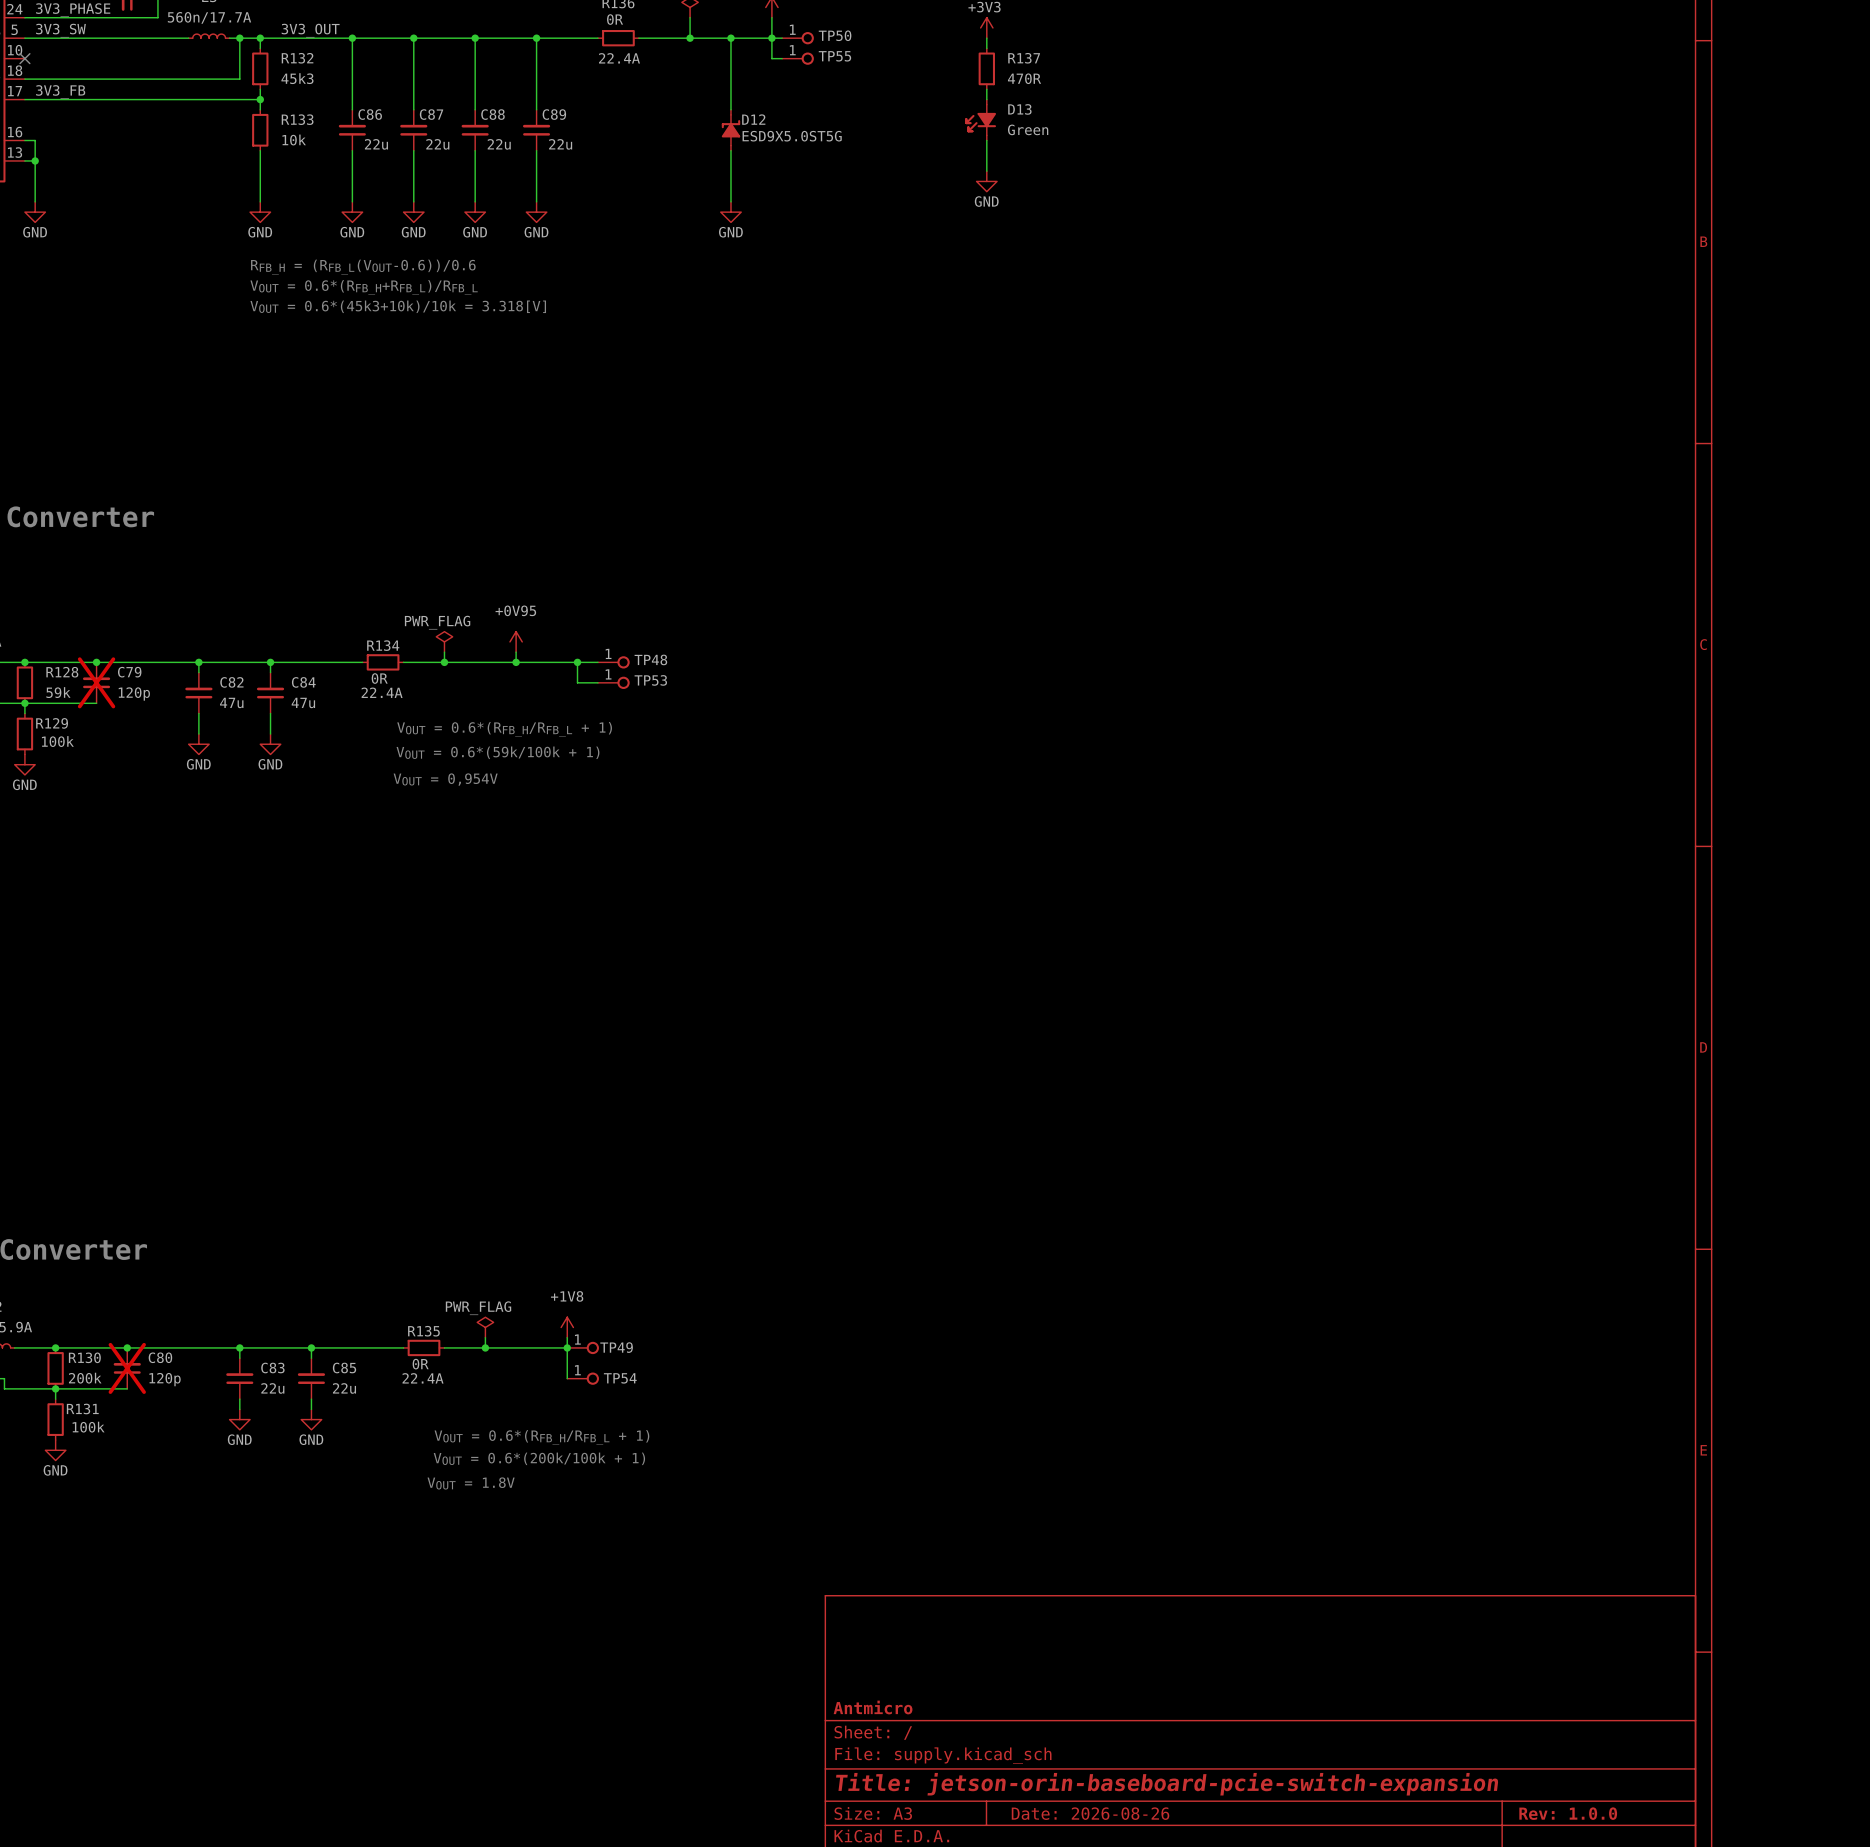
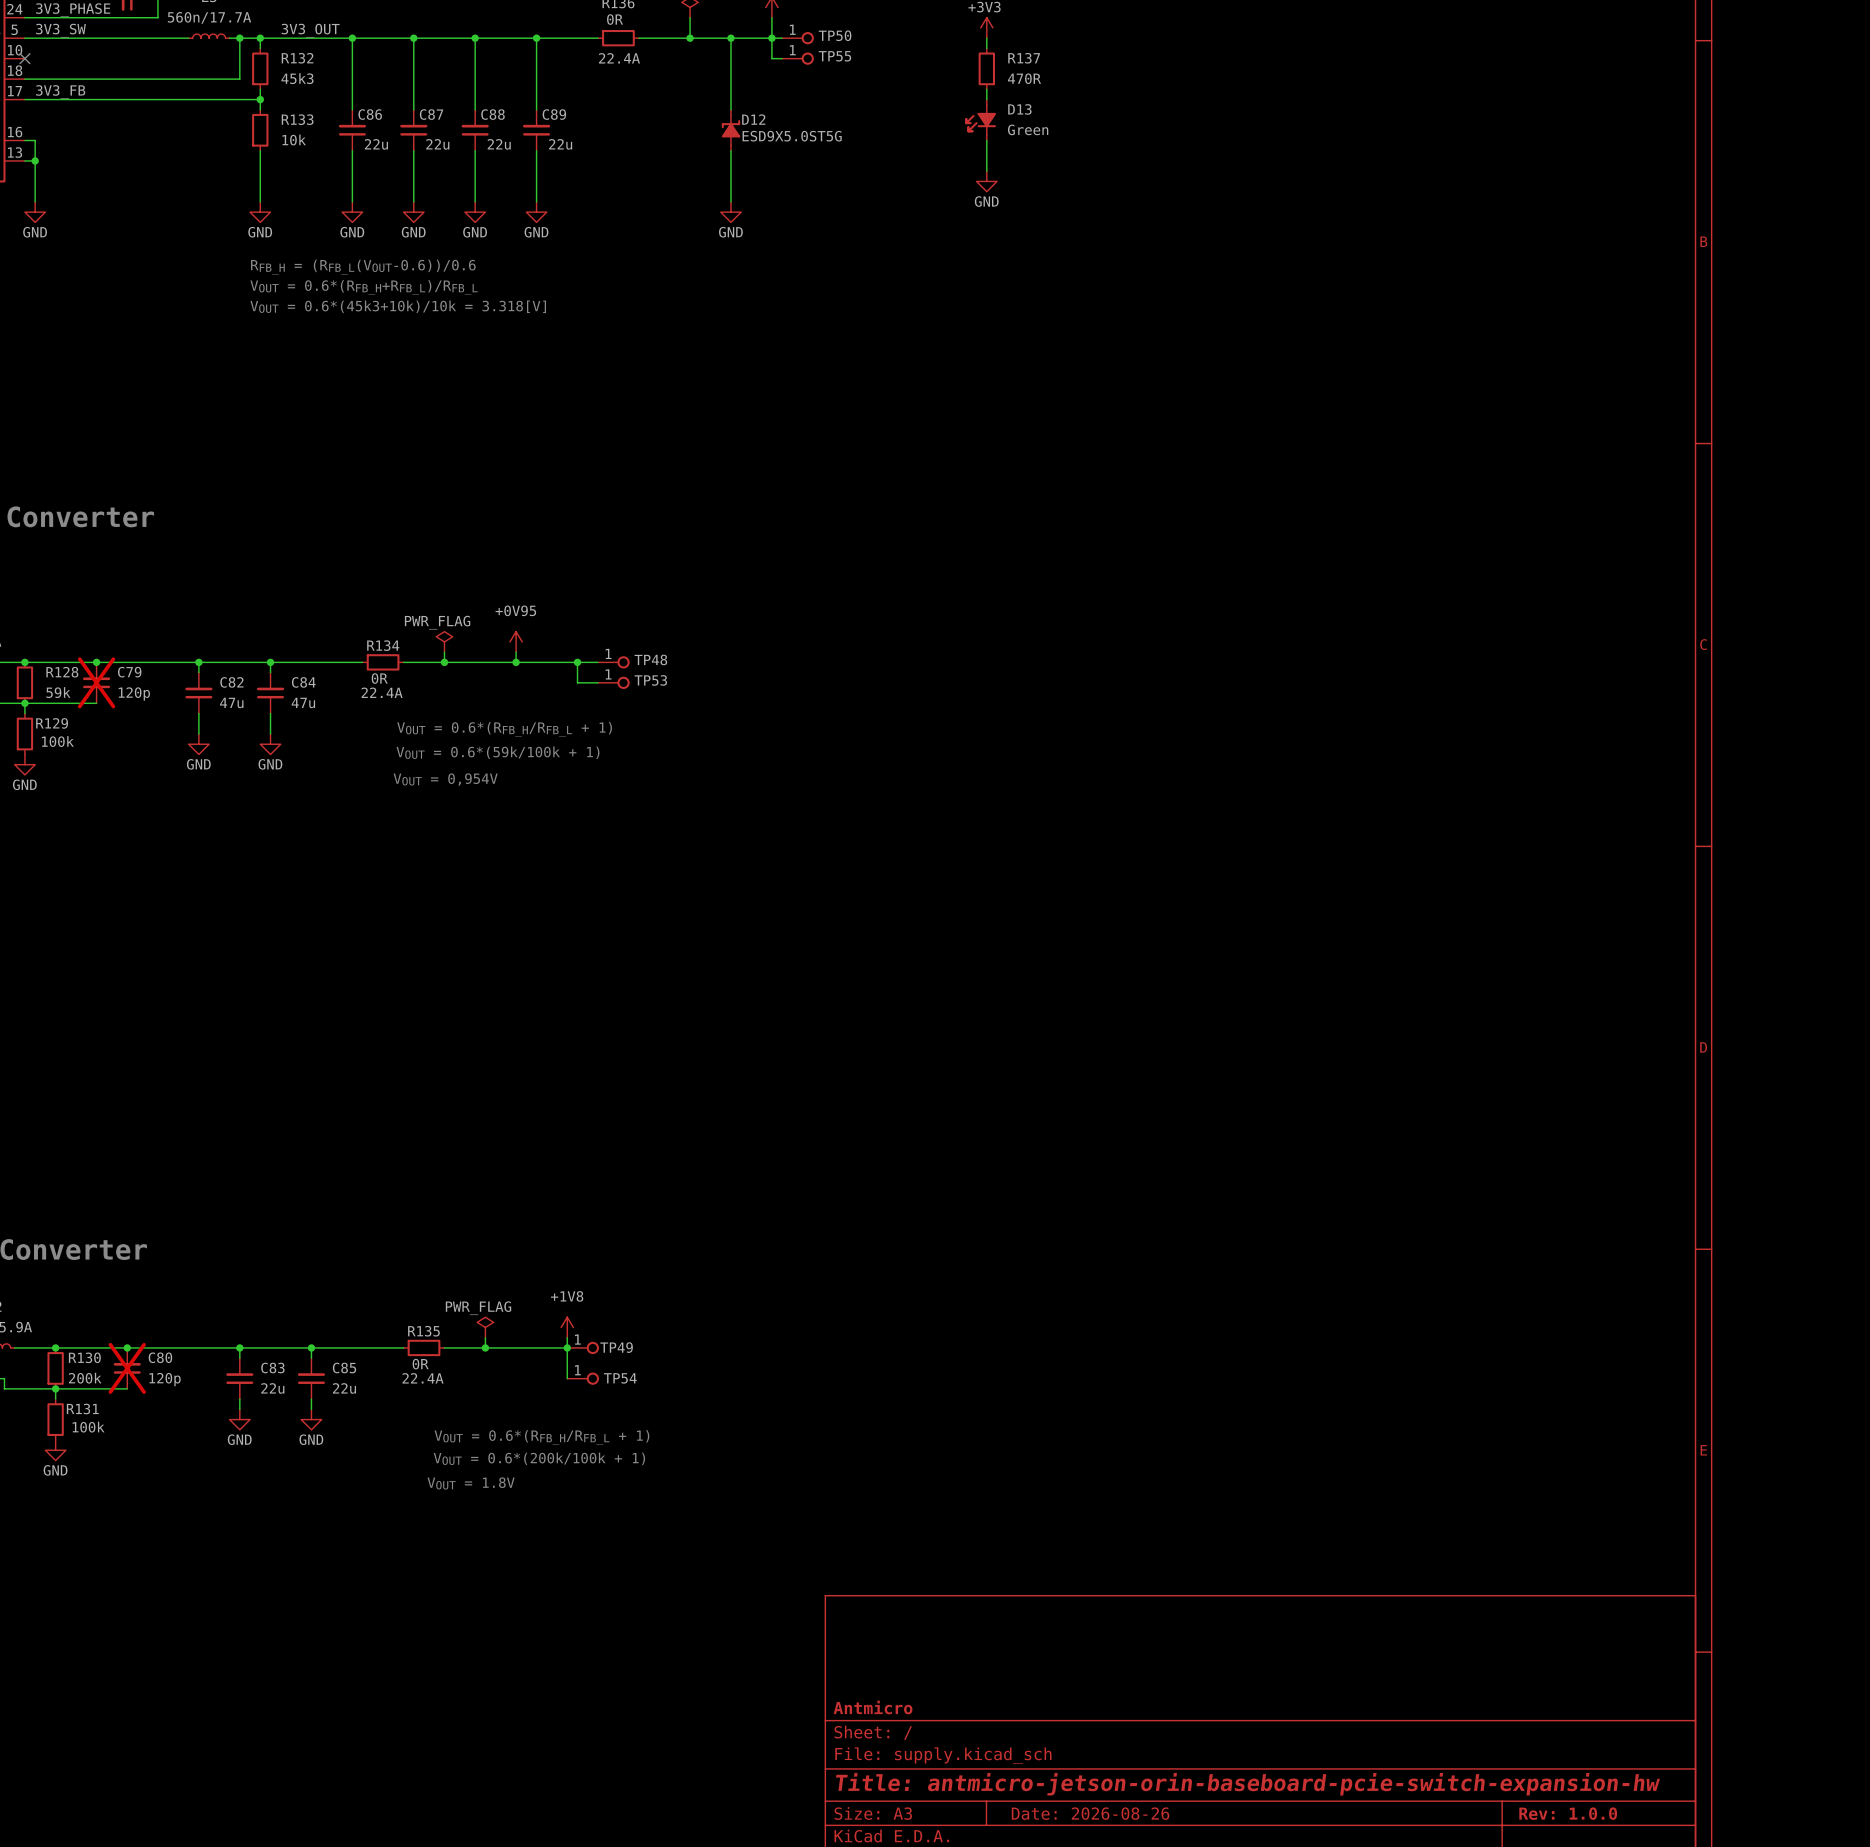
title block: Title: jetson-orin-baseboard-pcie-switch-expansion (1167, 1784) -> Title: antmicro-jetson-orin-baseboard-pcie-switch-expansion-hw (1247, 1784)

